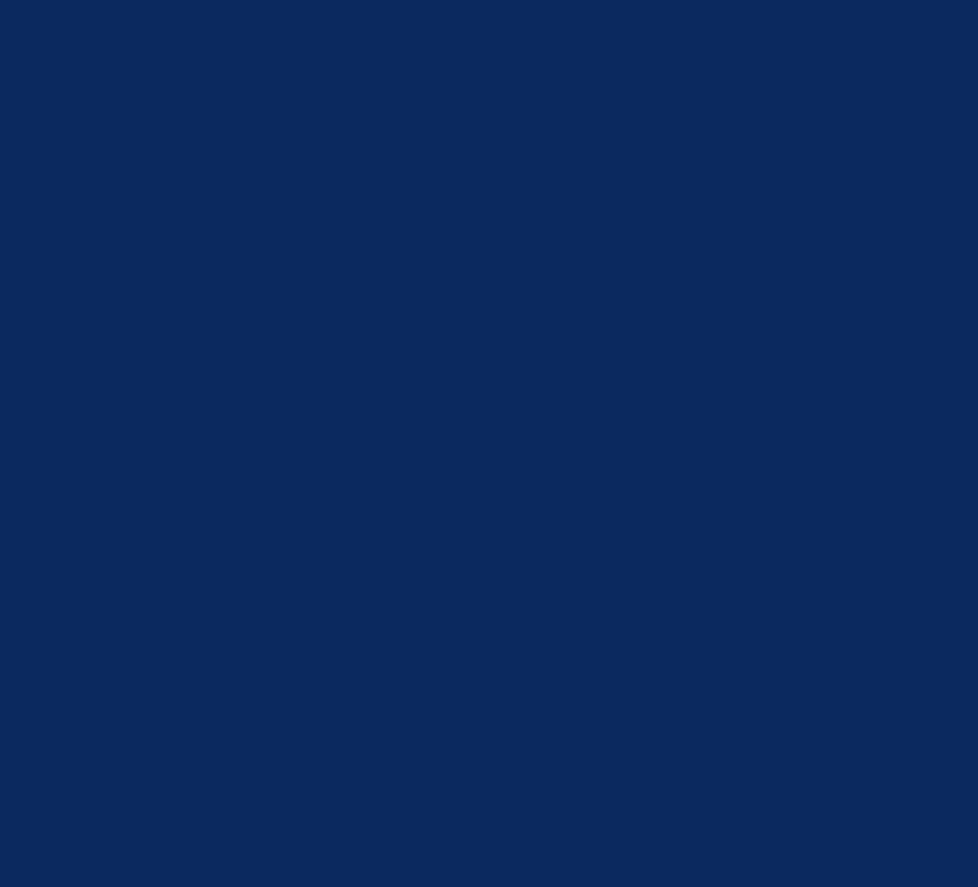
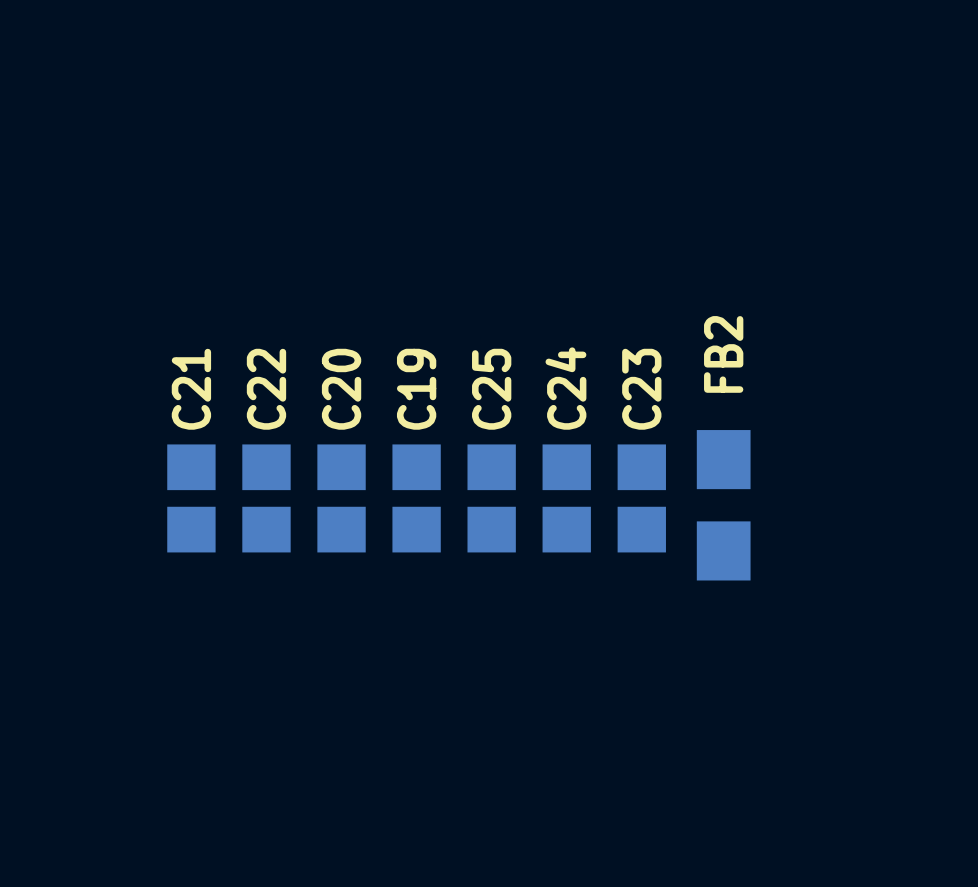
C21: none -> (191, 498)
C22: none -> (266, 498)
C20: none -> (341, 498)
C19: none -> (416, 498)
C25: none -> (491, 498)
C24: none -> (566, 498)
C23: none -> (641, 498)
FB2: none -> (723, 505)

